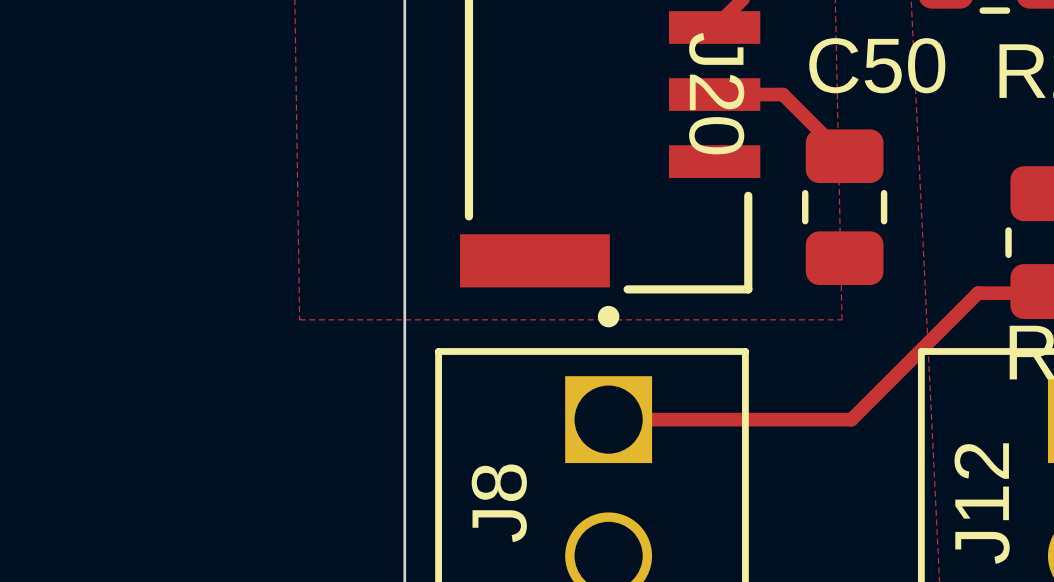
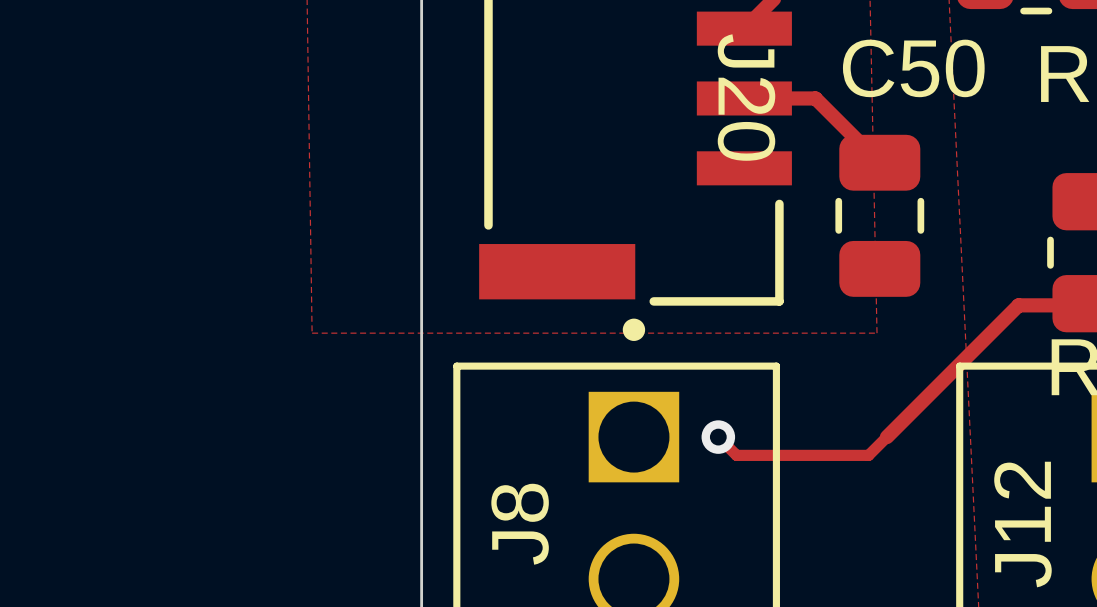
track: (608, 419) (851, 419) -> (718, 437) (736, 455) (868, 455) (886, 437)
via: none -> (718, 437)

